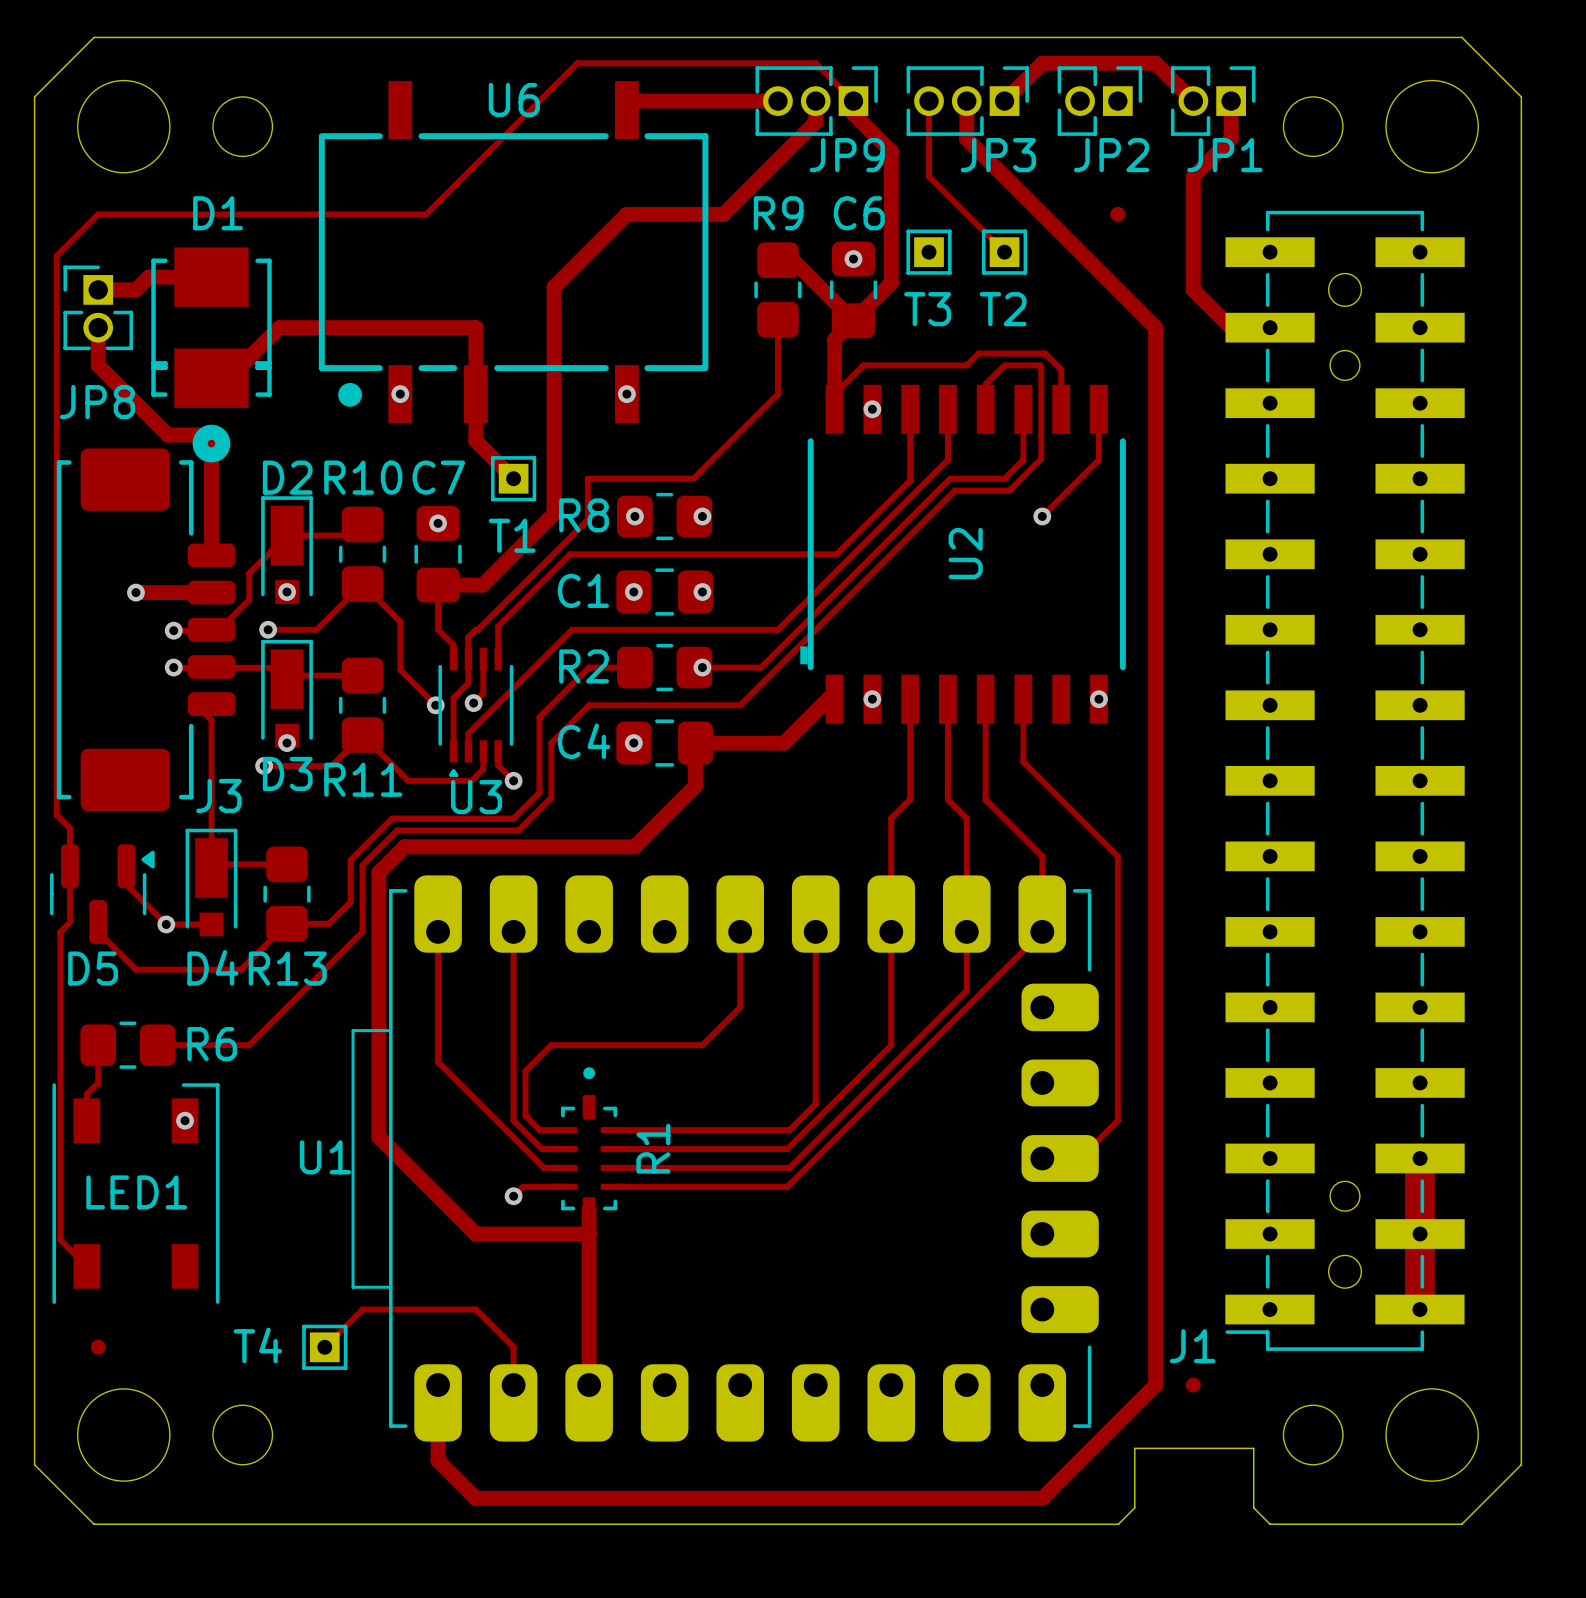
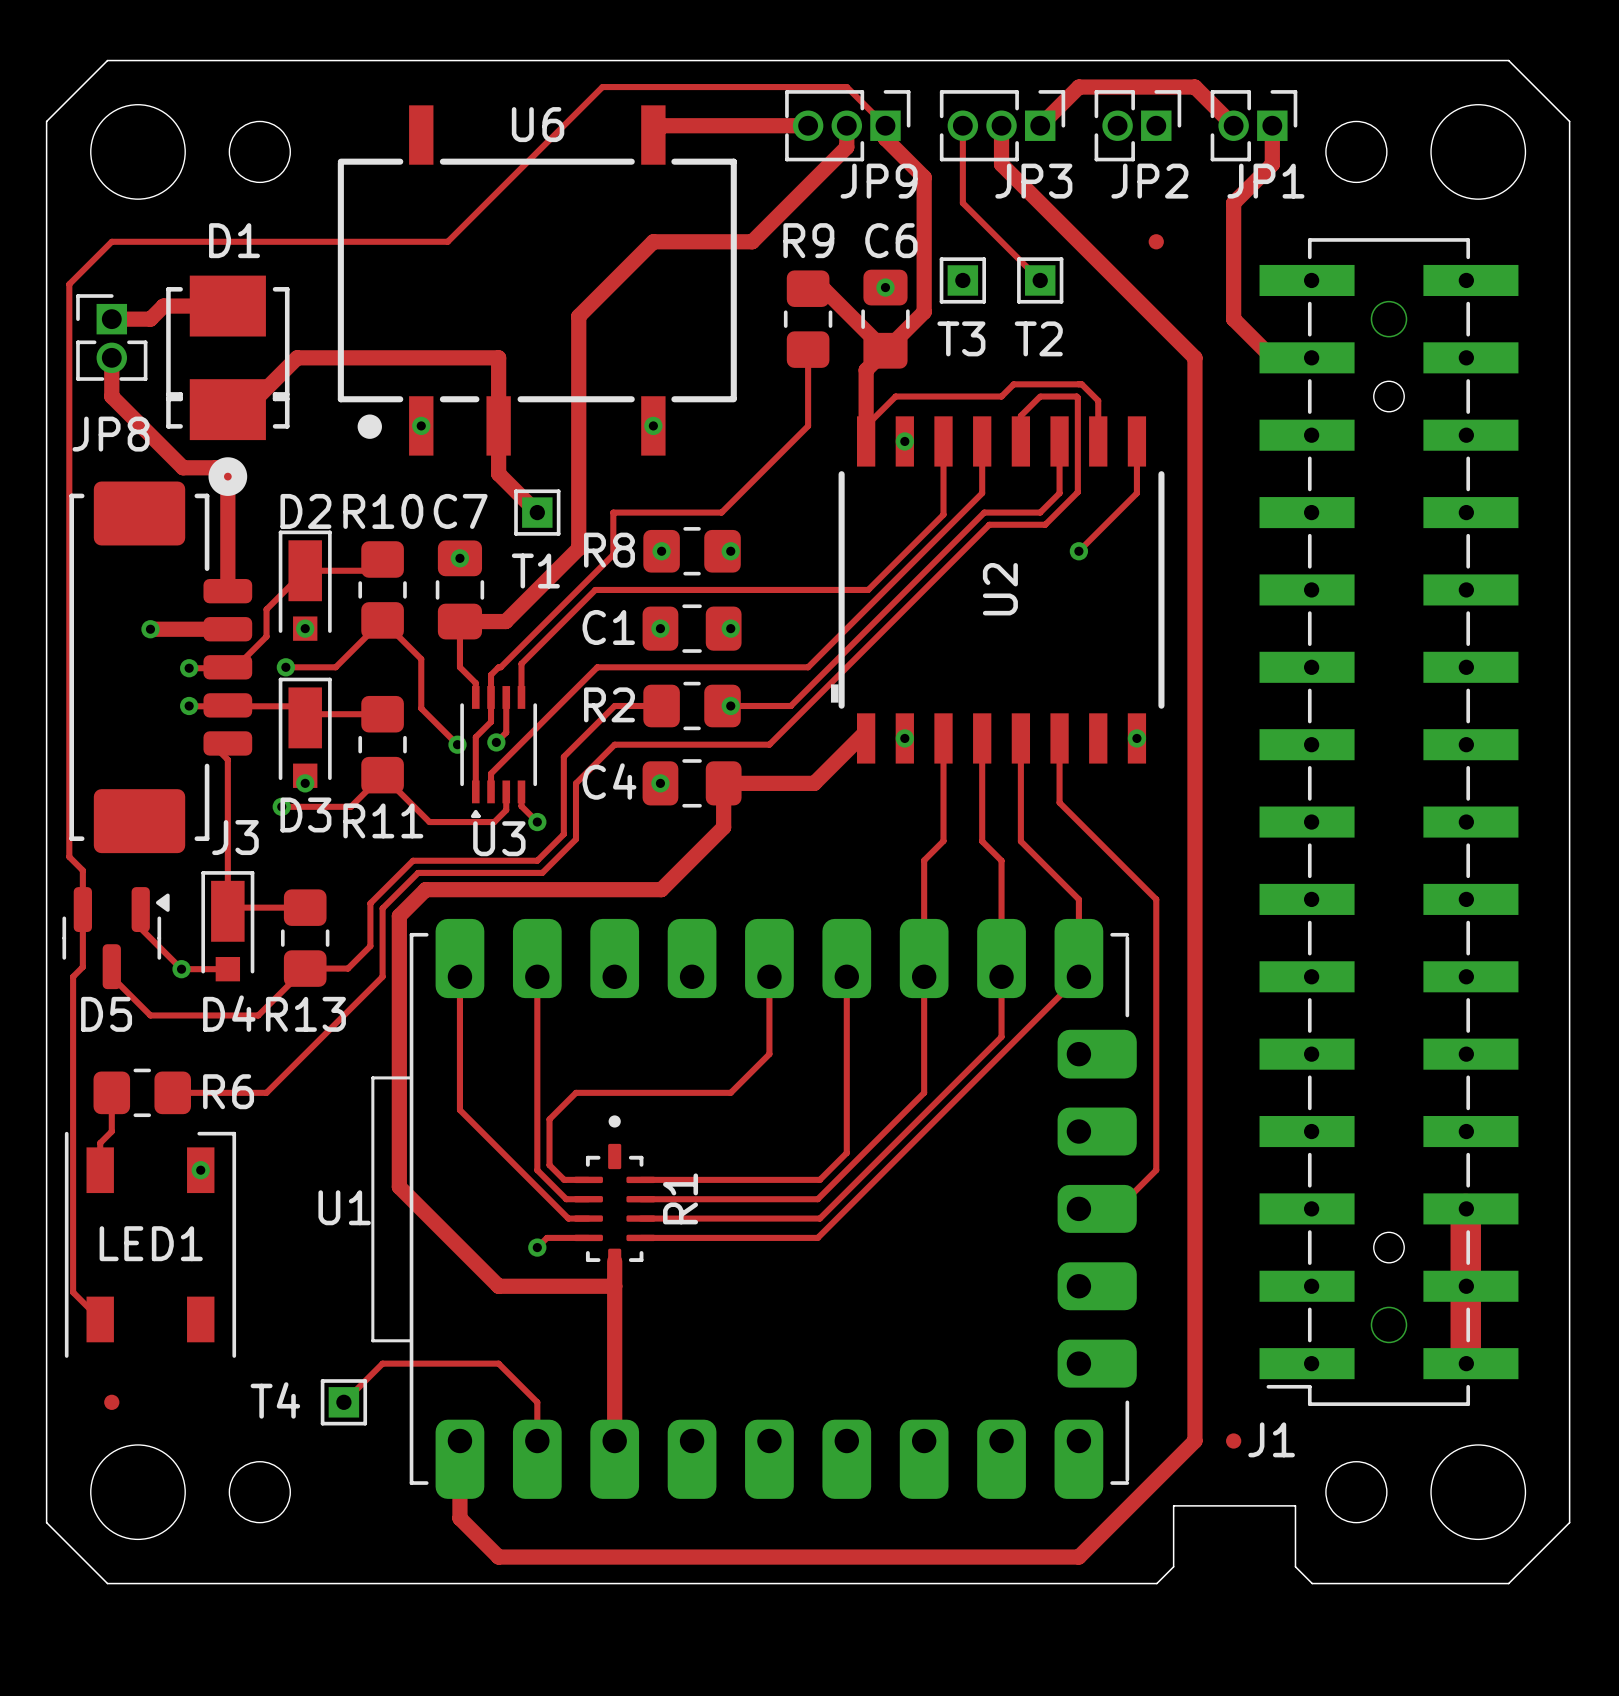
J1 footprint: [1225, 210, 1465, 1351] -> [1259, 238, 1519, 1406]

